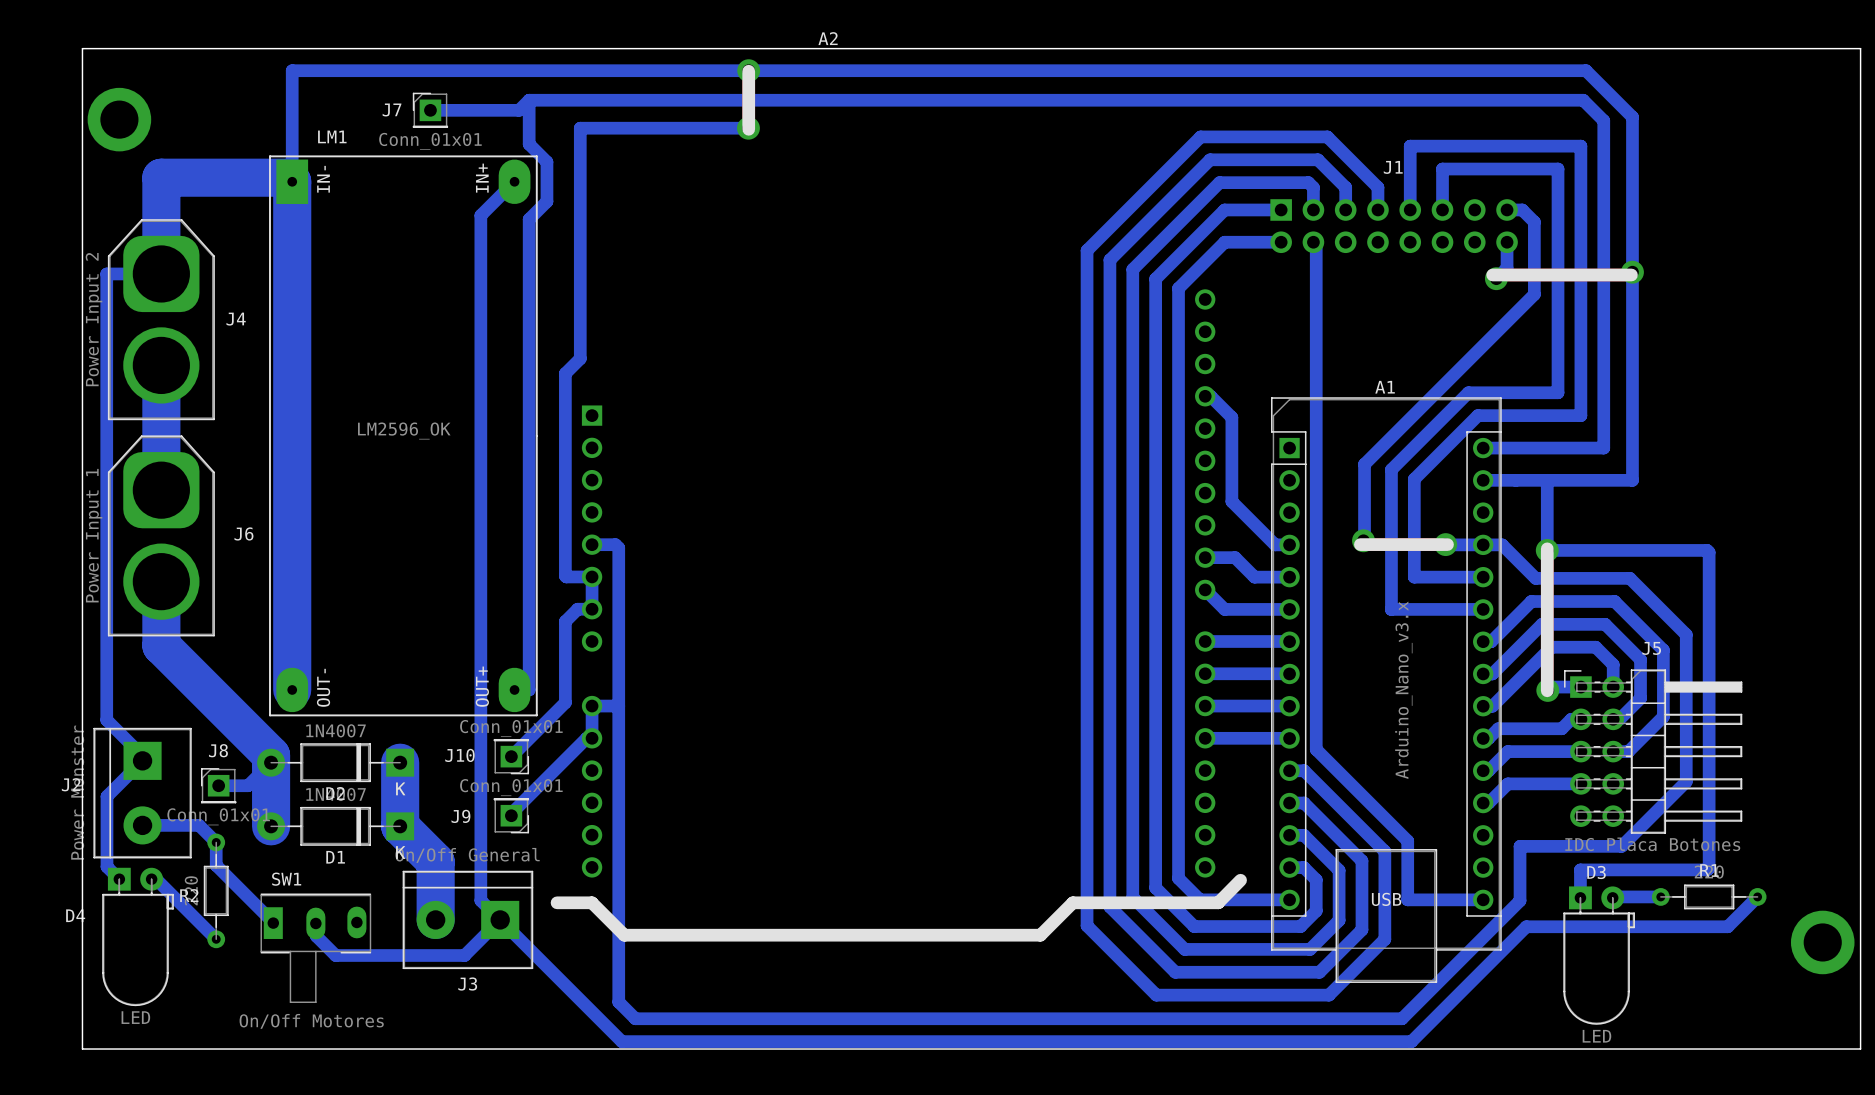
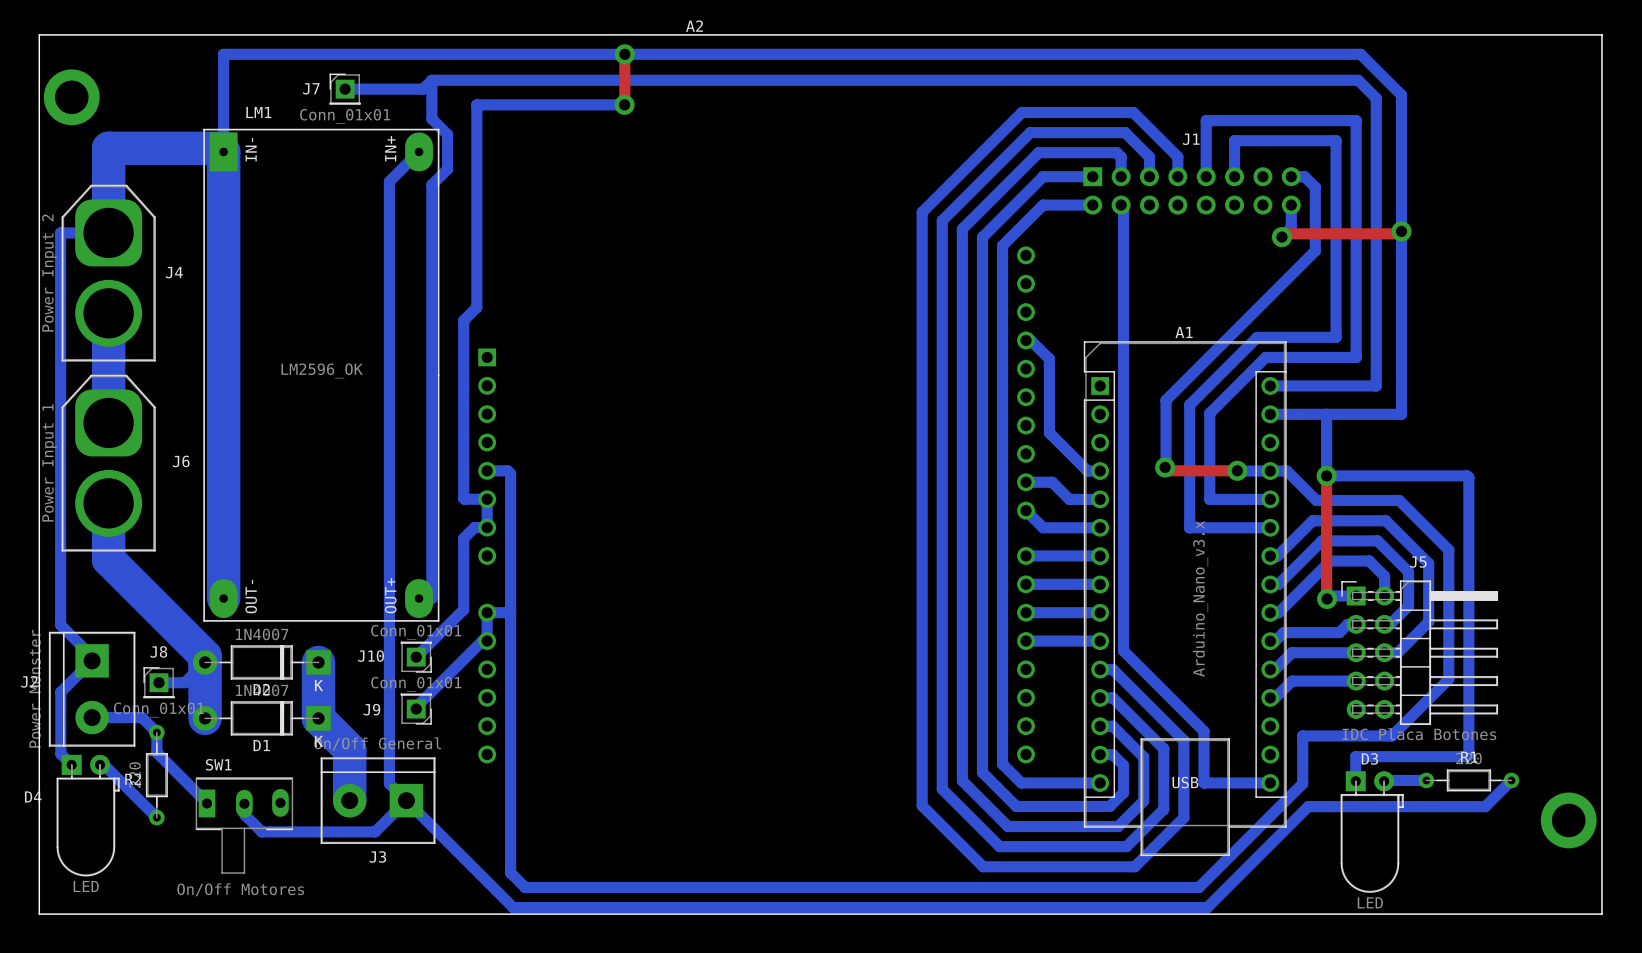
line: (748, 71) (748, 129) -> none
line: (1492, 274) (1631, 274) -> none
line: (1360, 544) (1447, 544) -> none
line: (1547, 548) (1547, 690) -> none
line: (1240, 880) (1218, 902) (1072, 902) (1040, 935) (624, 935) (591, 902) (557, 902) -> none

